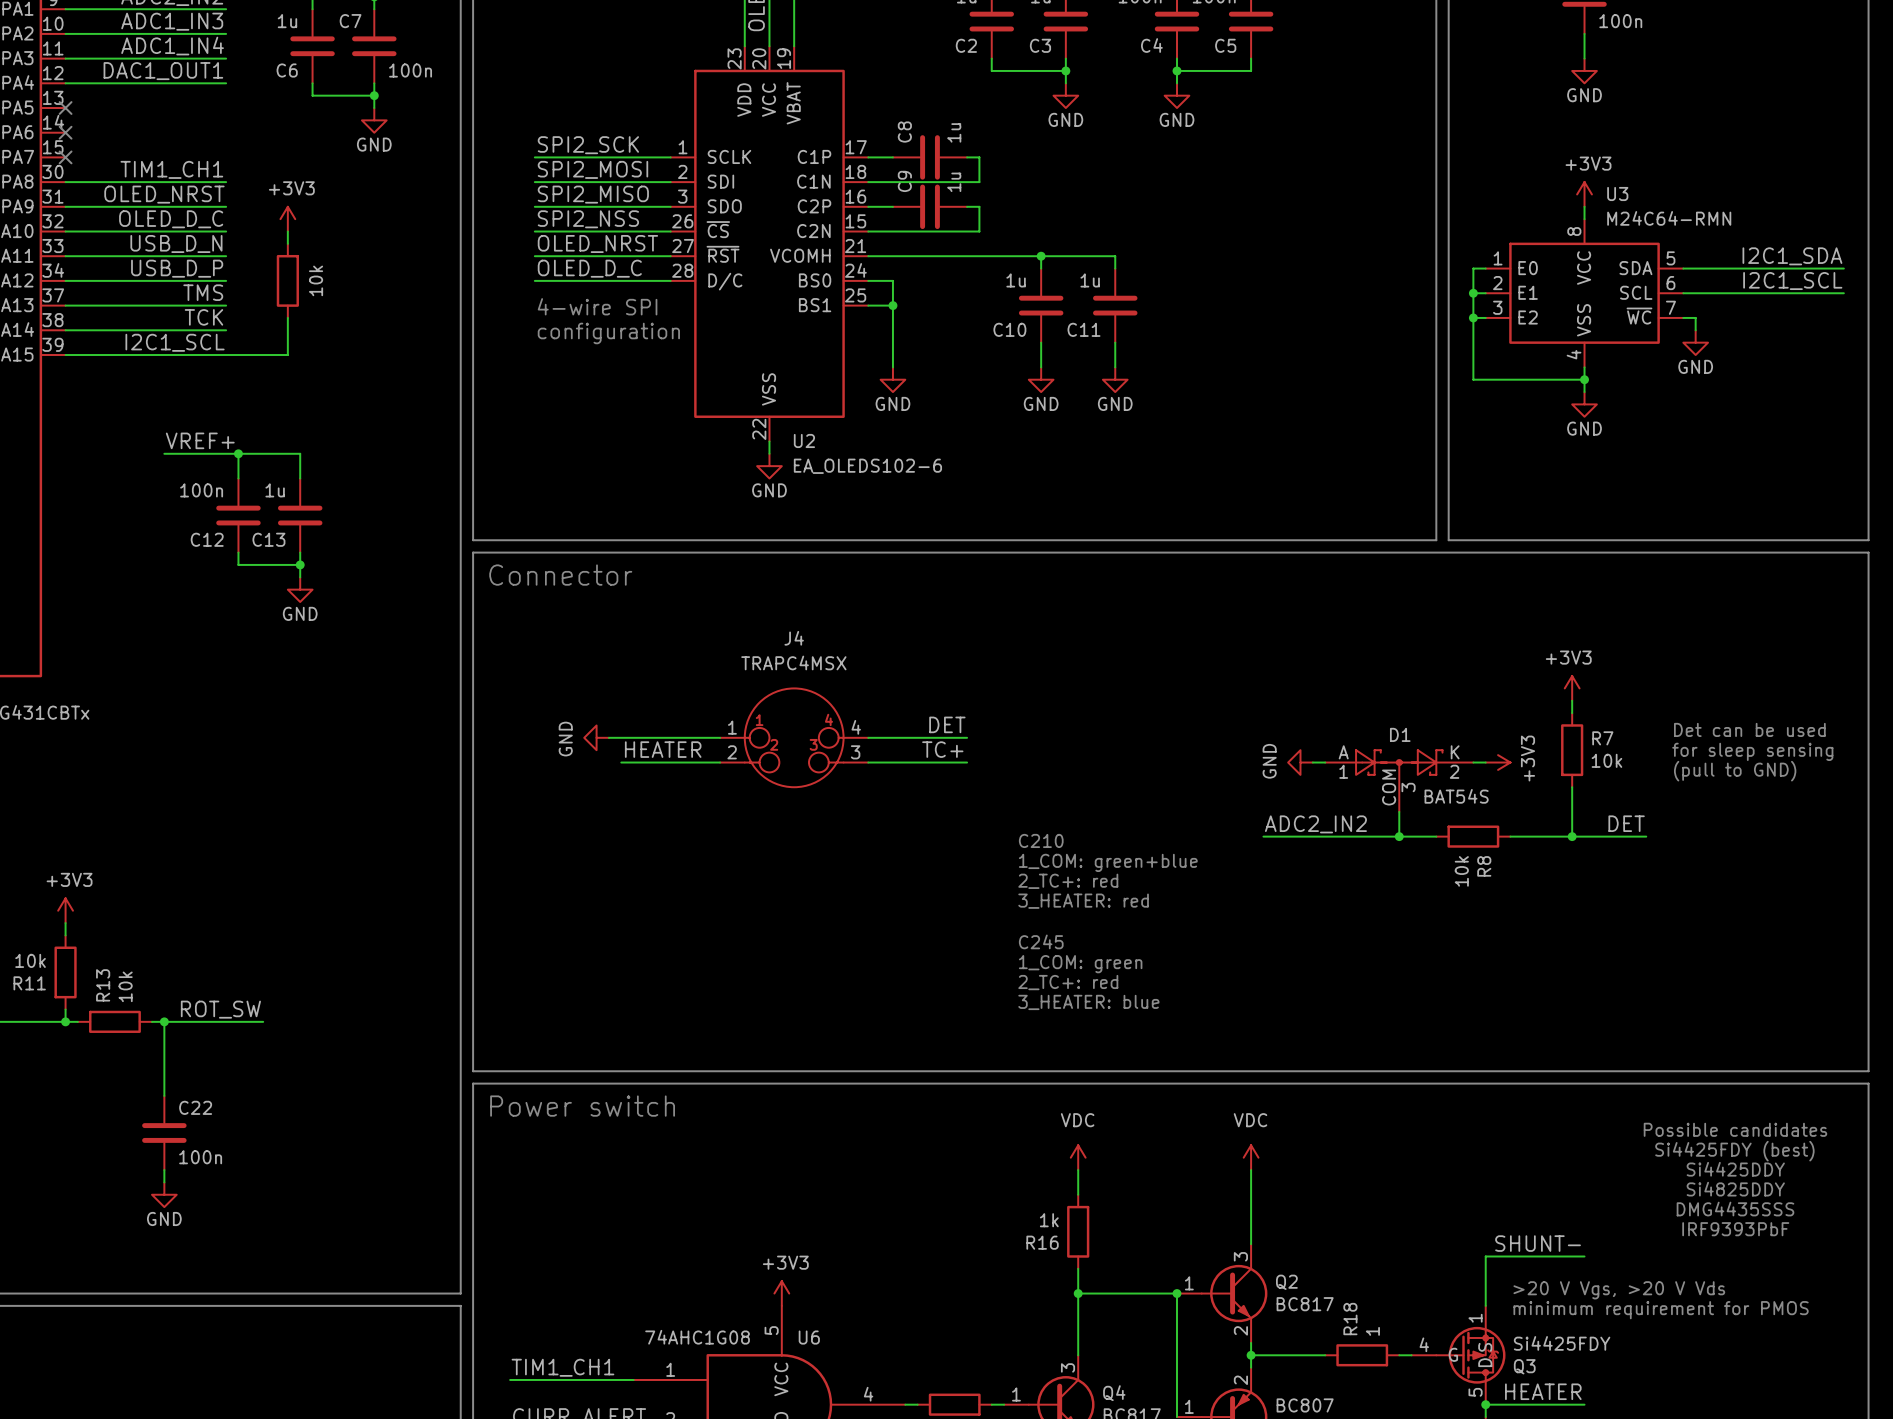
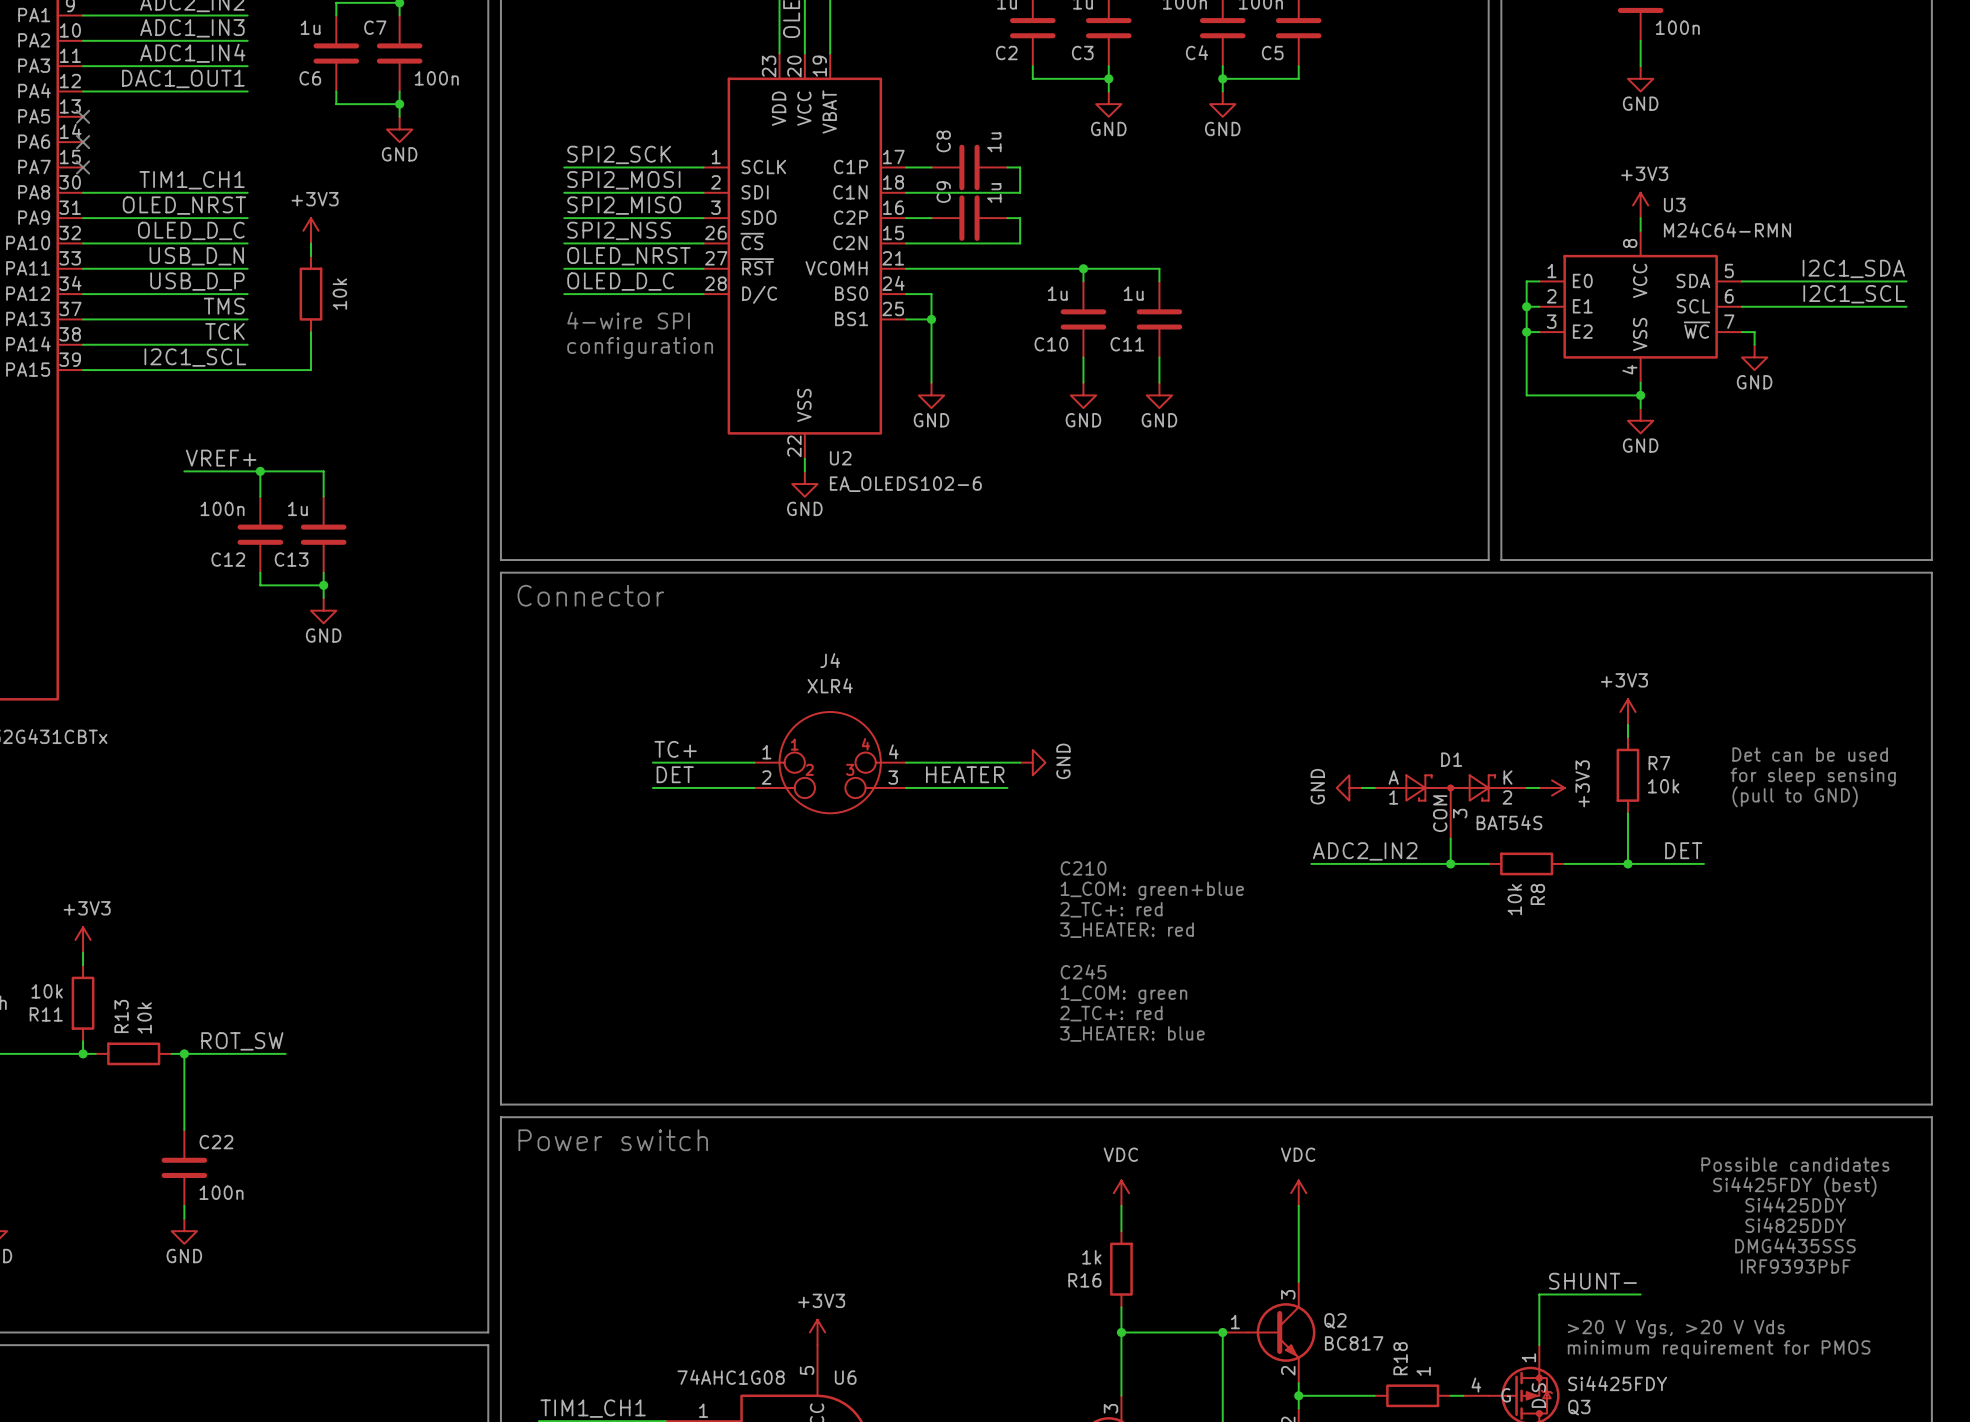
J4 value: TRAPC4MSX (793, 662) -> XLR4 (830, 685)
label: none -> TC+ (675, 749)
label: DET (947, 724) -> none
power symbol: GND (596, 737) -> none
wire: (608, 737) (621, 737) -> none
wire: none -> (1007, 762) (1020, 762)
power symbol: none -> GND (1032, 762)
label: HEATER (663, 749) -> DET (675, 774)
label: TC+ (942, 749) -> HEATER (965, 774)

